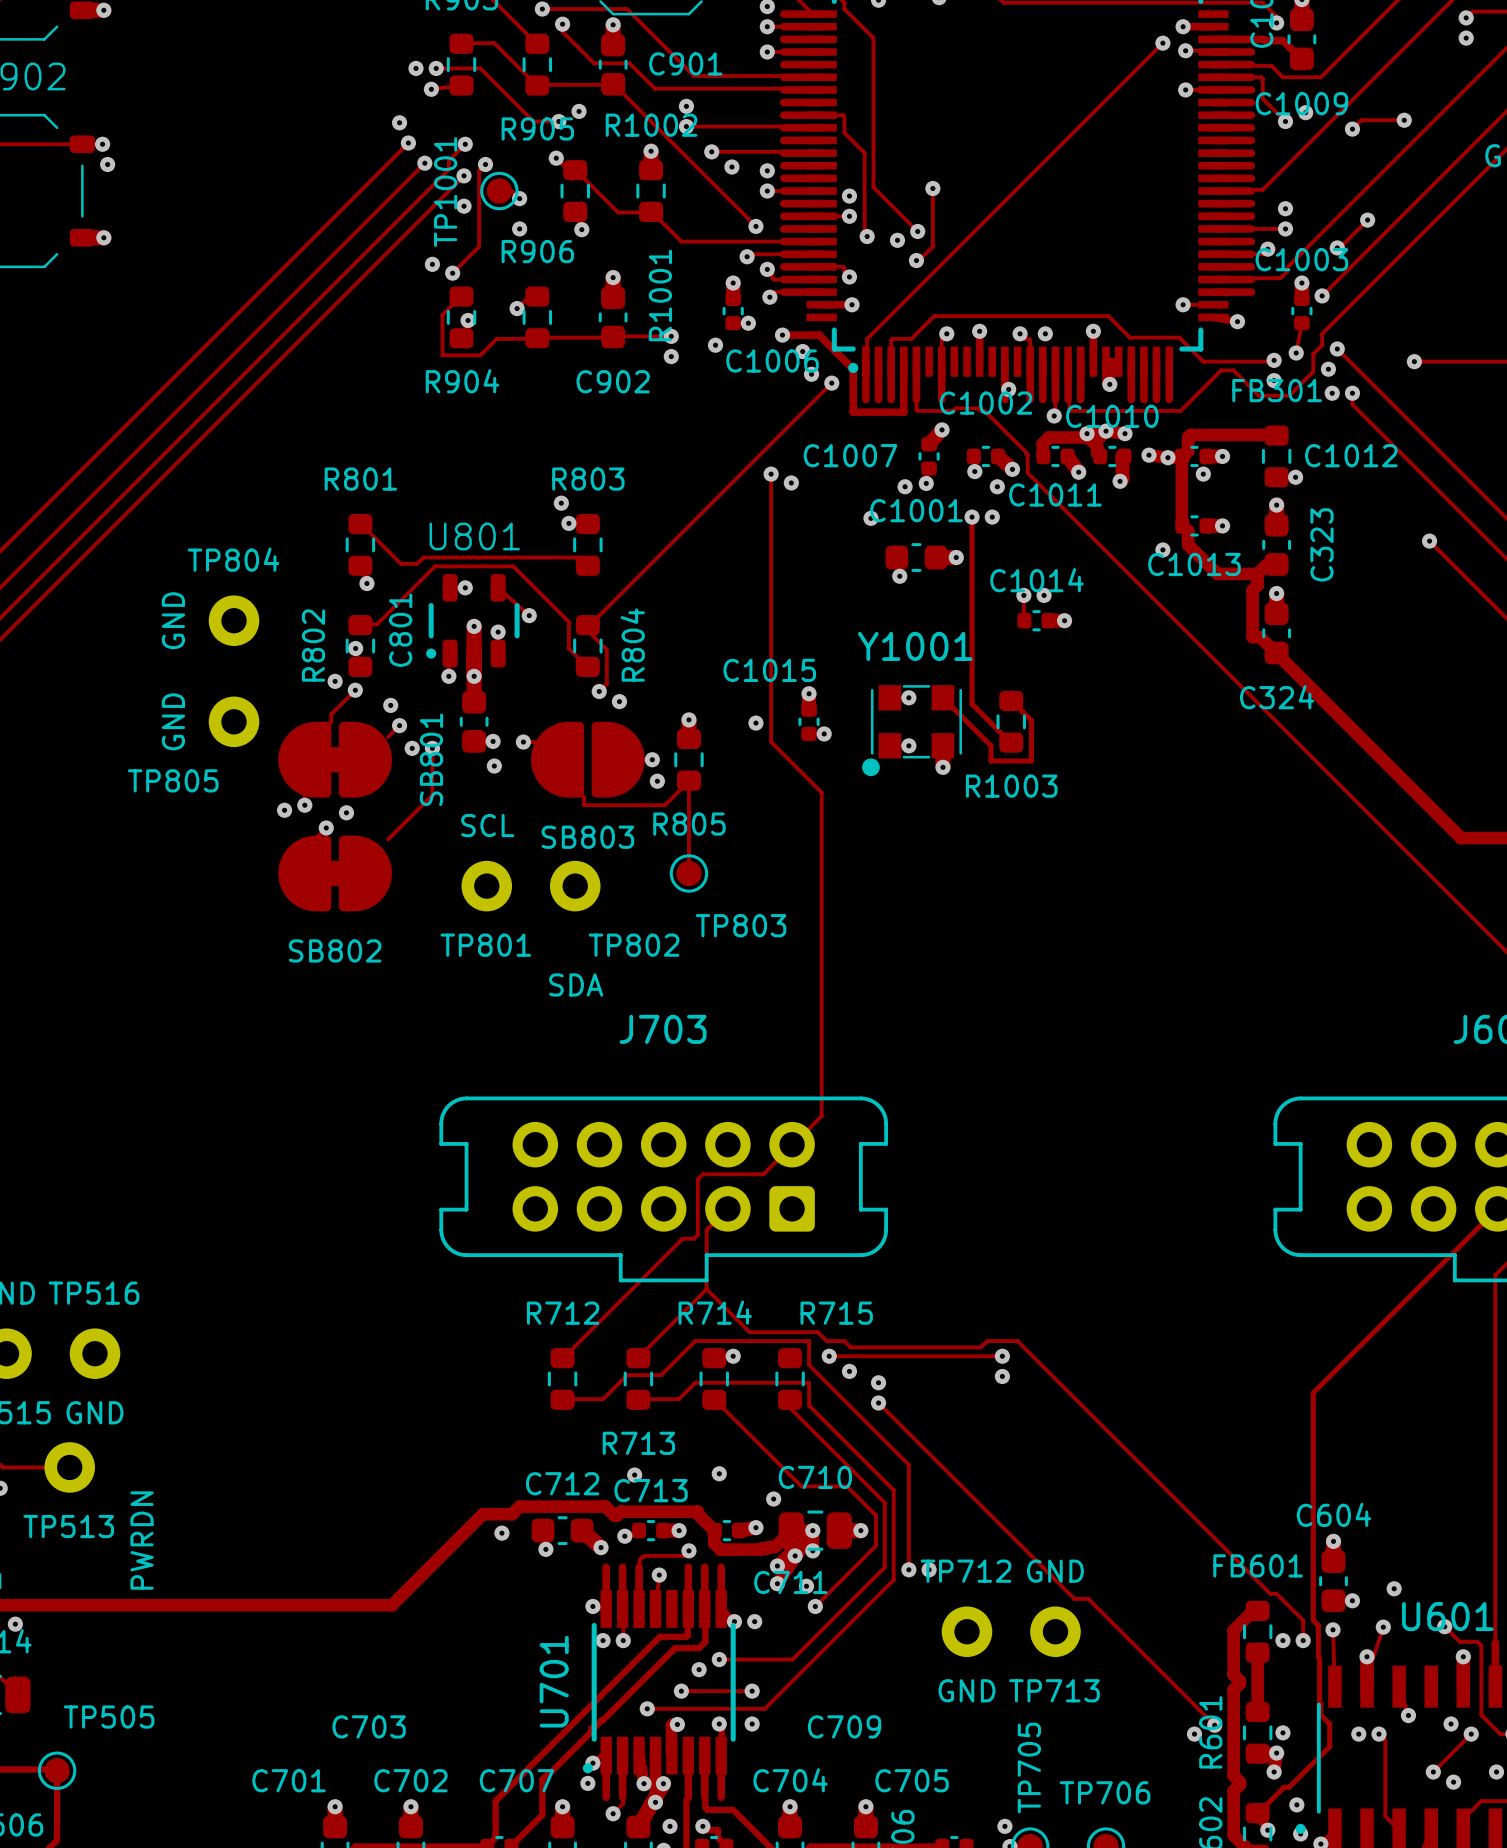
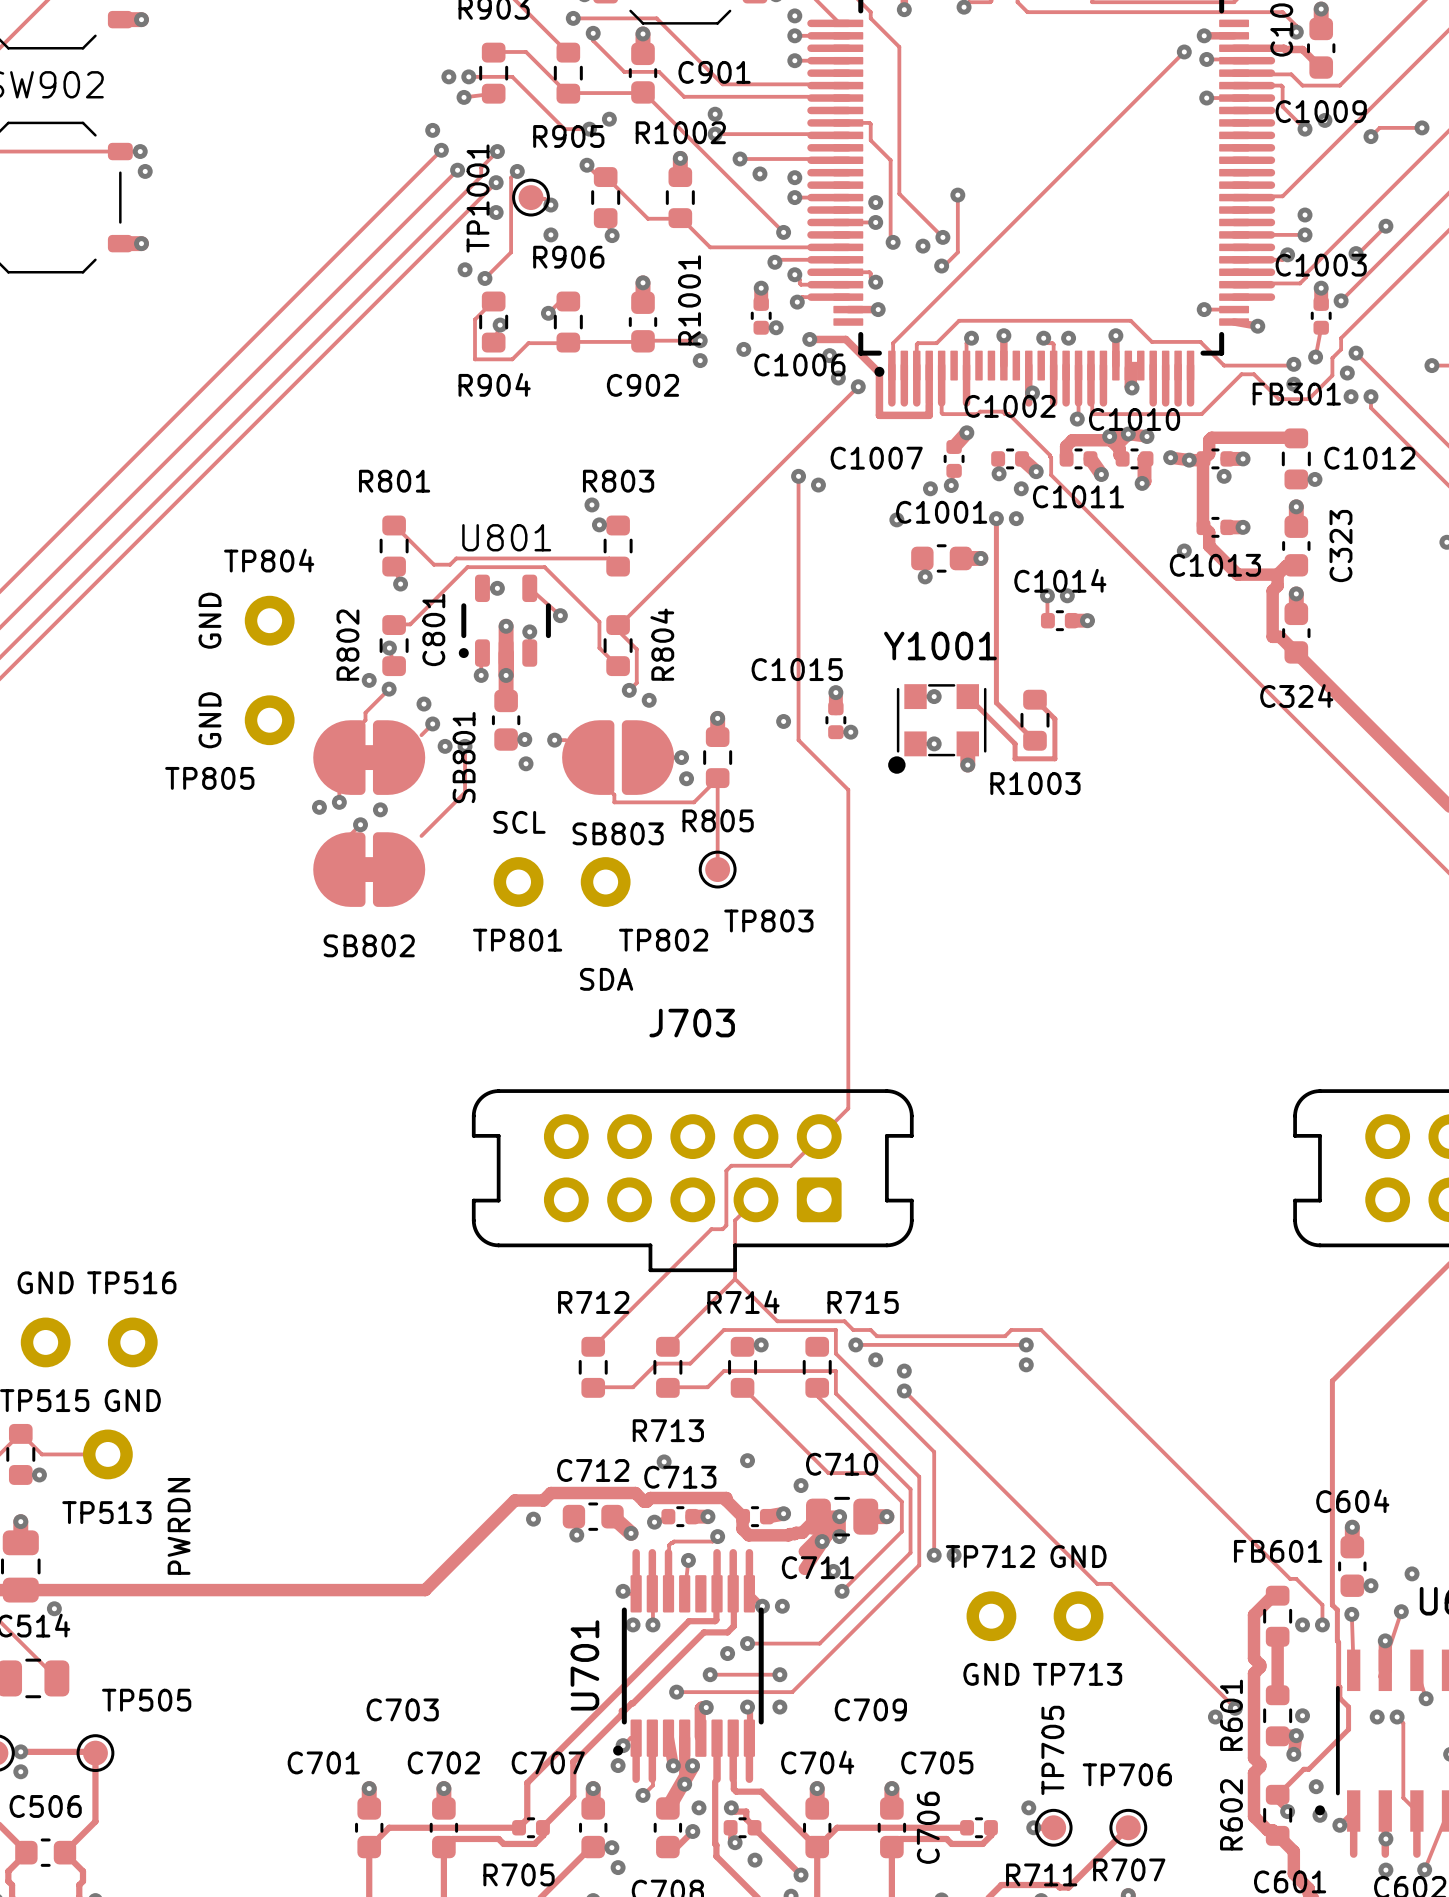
via: (777, 1566) -> none
via: (777, 1583) -> none

